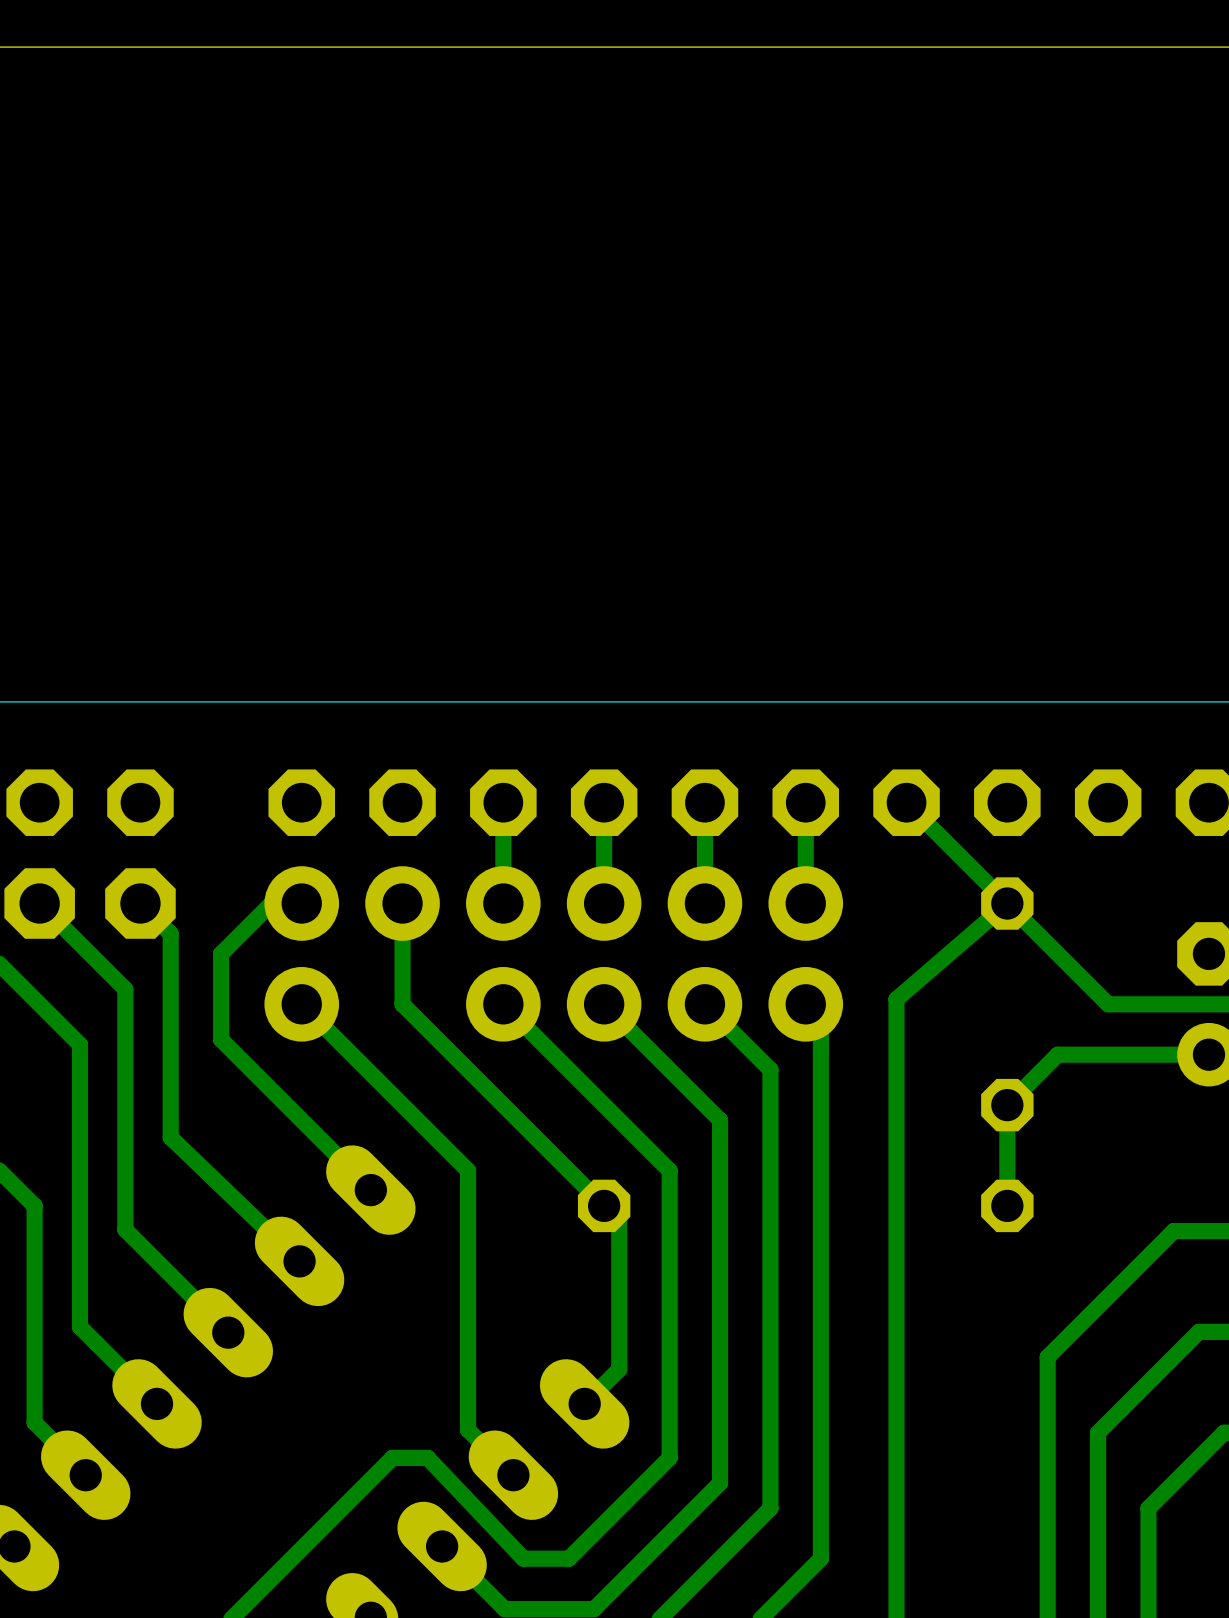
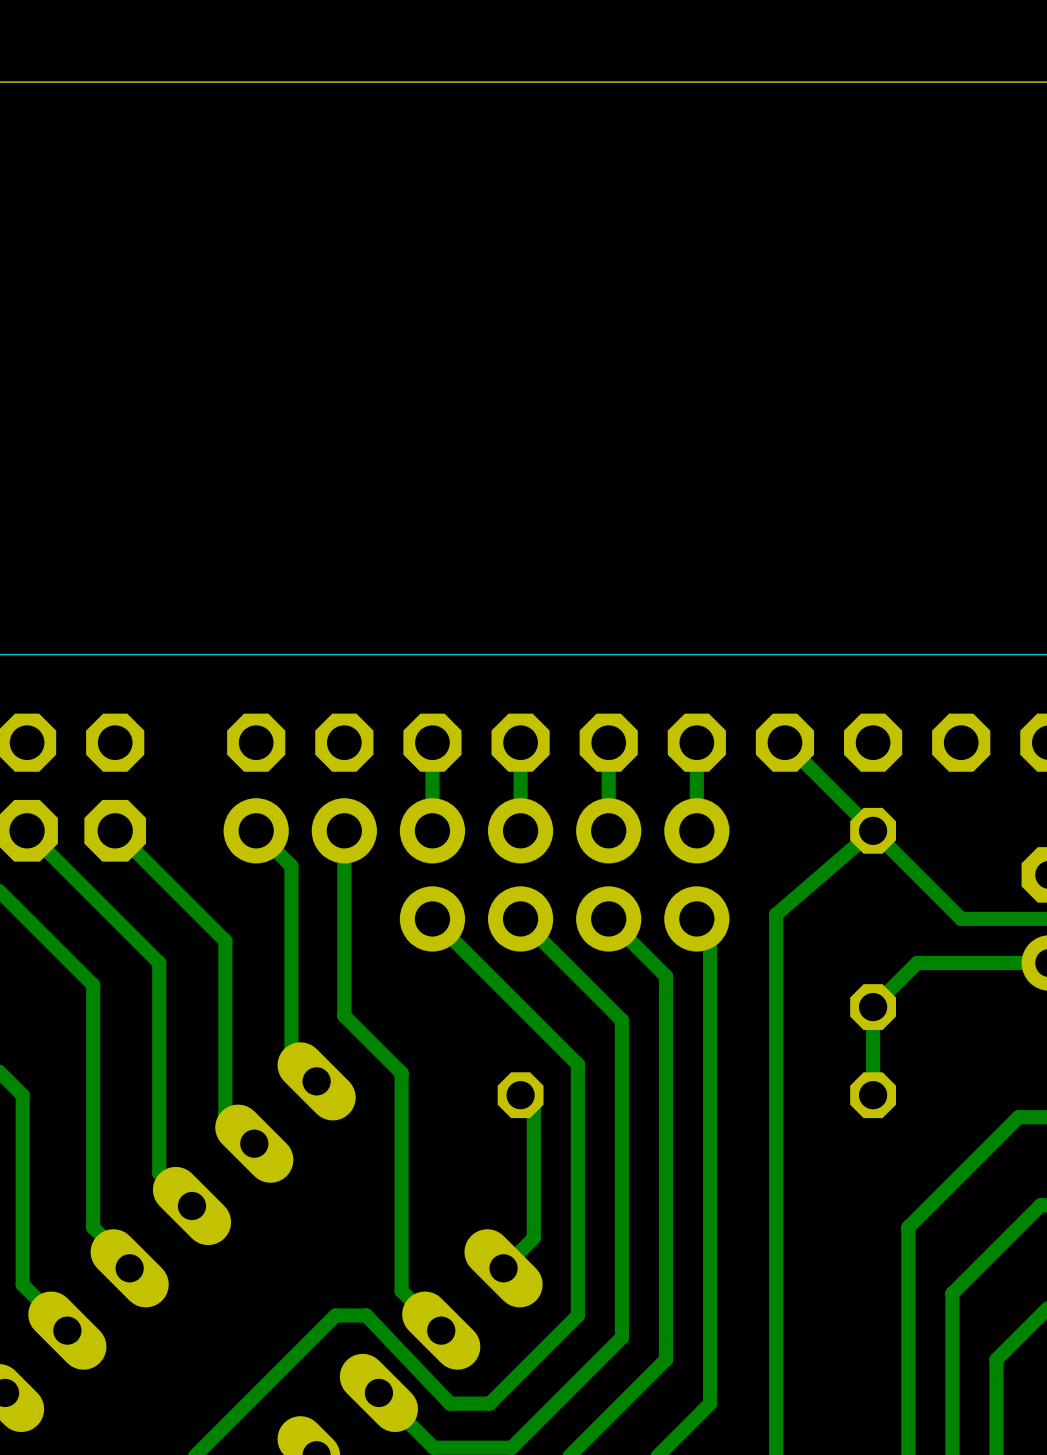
bottom track: (301, 903) (271, 903) (221, 953) (221, 1039) (370, 1189) -> (256, 830) (291, 866) (291, 1051) (316, 1076) (316, 1080)
bottom track: (170, 933) (170, 1137) (299, 1261) -> (141, 857) (225, 940) (225, 1114) (254, 1143)
bottom track: (125, 989) (125, 1229) (190, 1295) -> (101, 905) (159, 963) (159, 1173)
bottom track: (301, 1004) (468, 1170) (468, 1180) -> (344, 918) (344, 1015) (401, 1073)
part: (301, 1004) -> none
bottom track: (402, 1004) (604, 1205) -> none
bottom track: (79, 1044) (79, 1326) (157, 1403) -> (62, 954) (93, 985) (93, 1227) (129, 1268)

